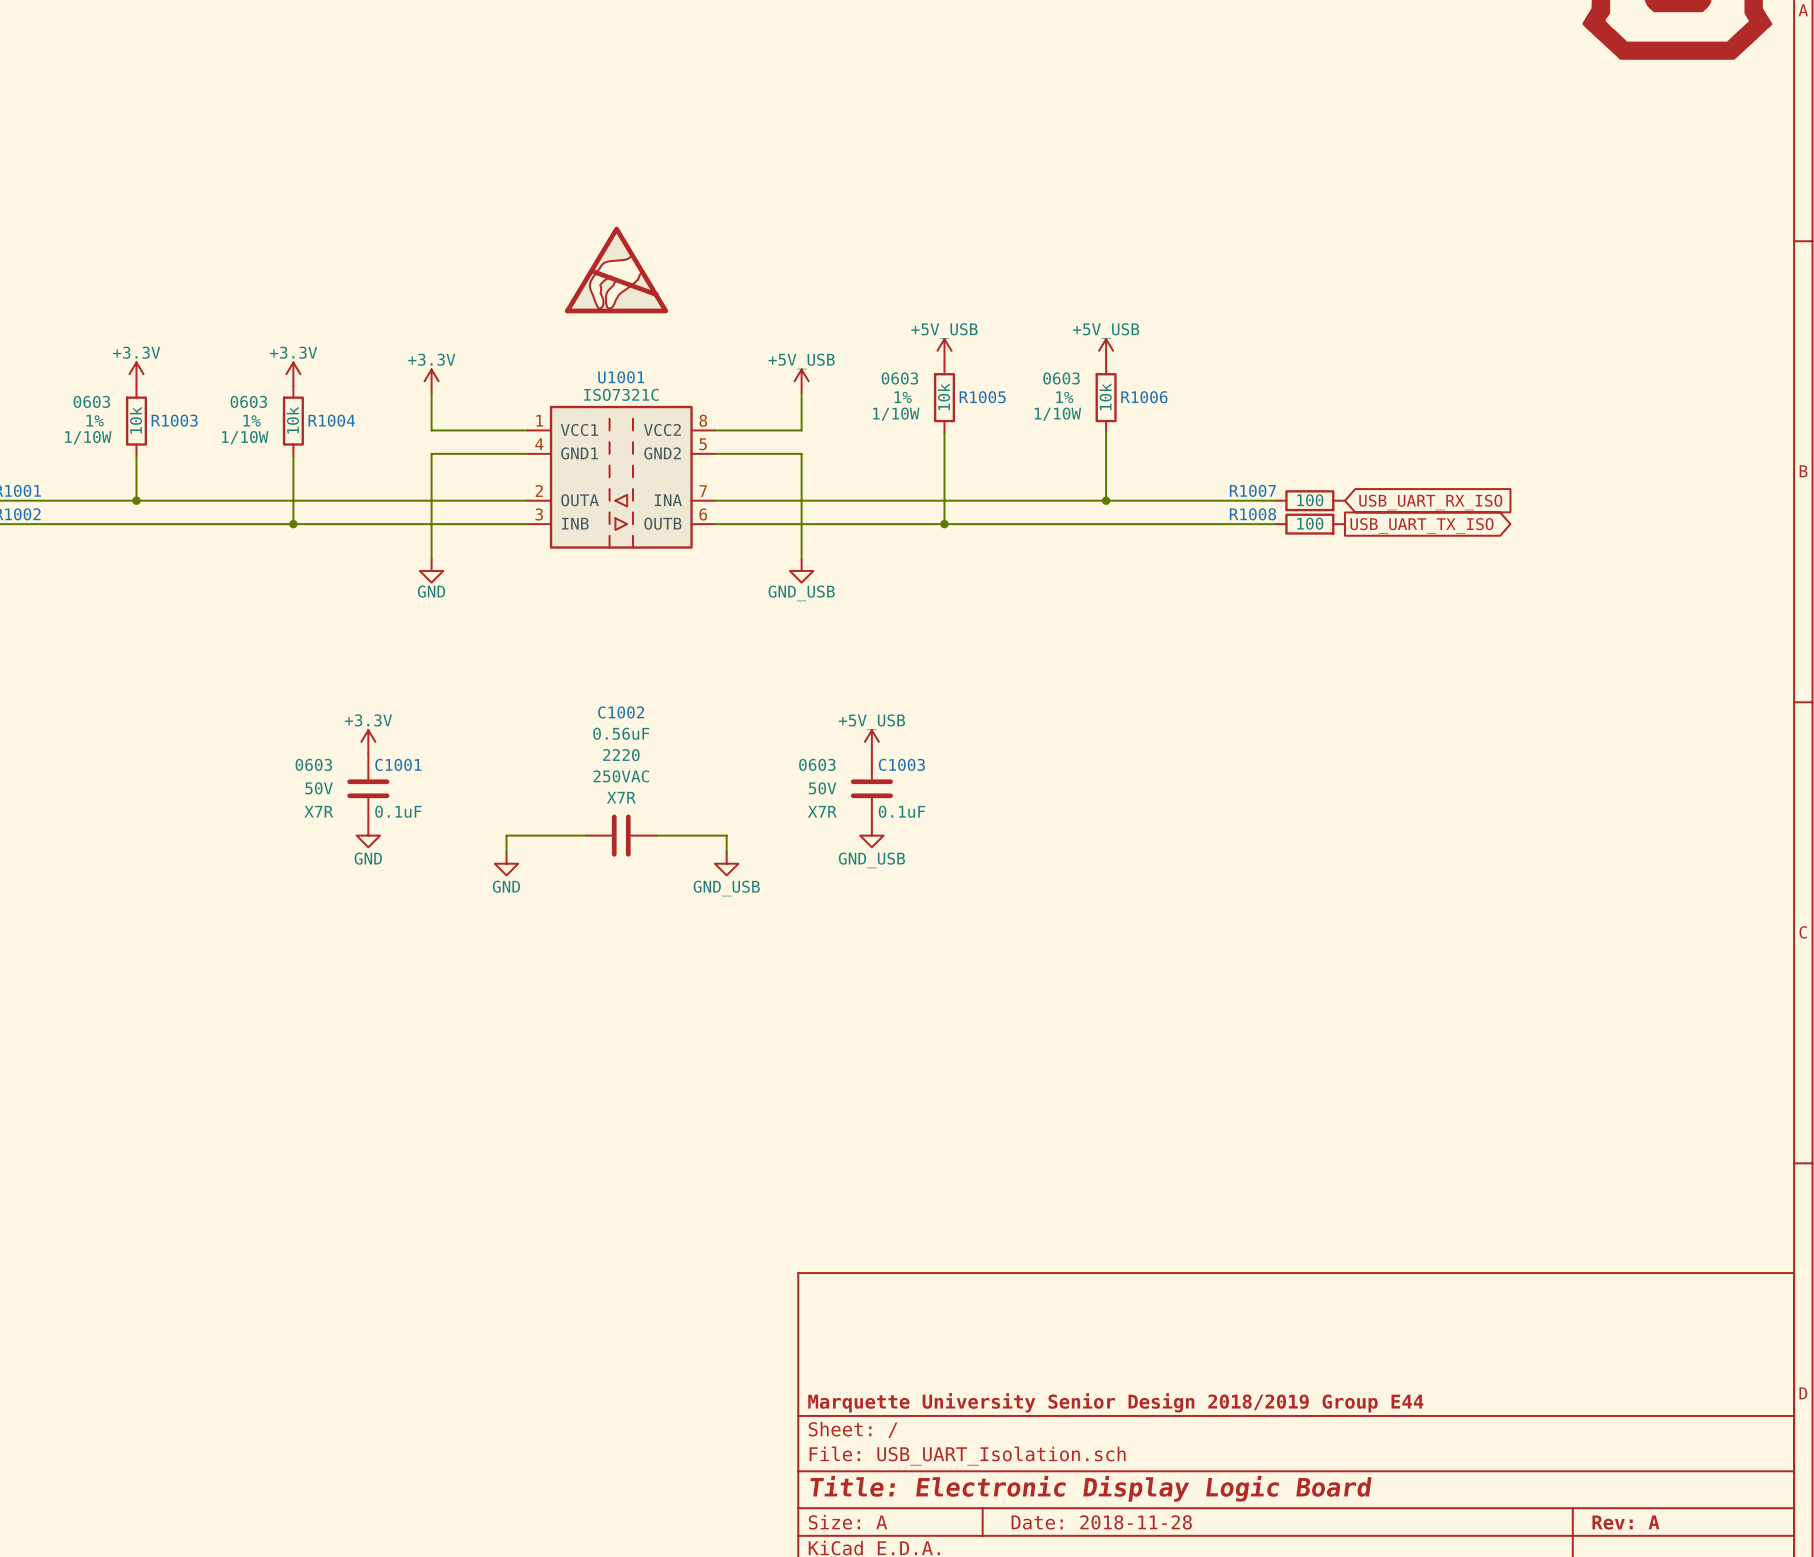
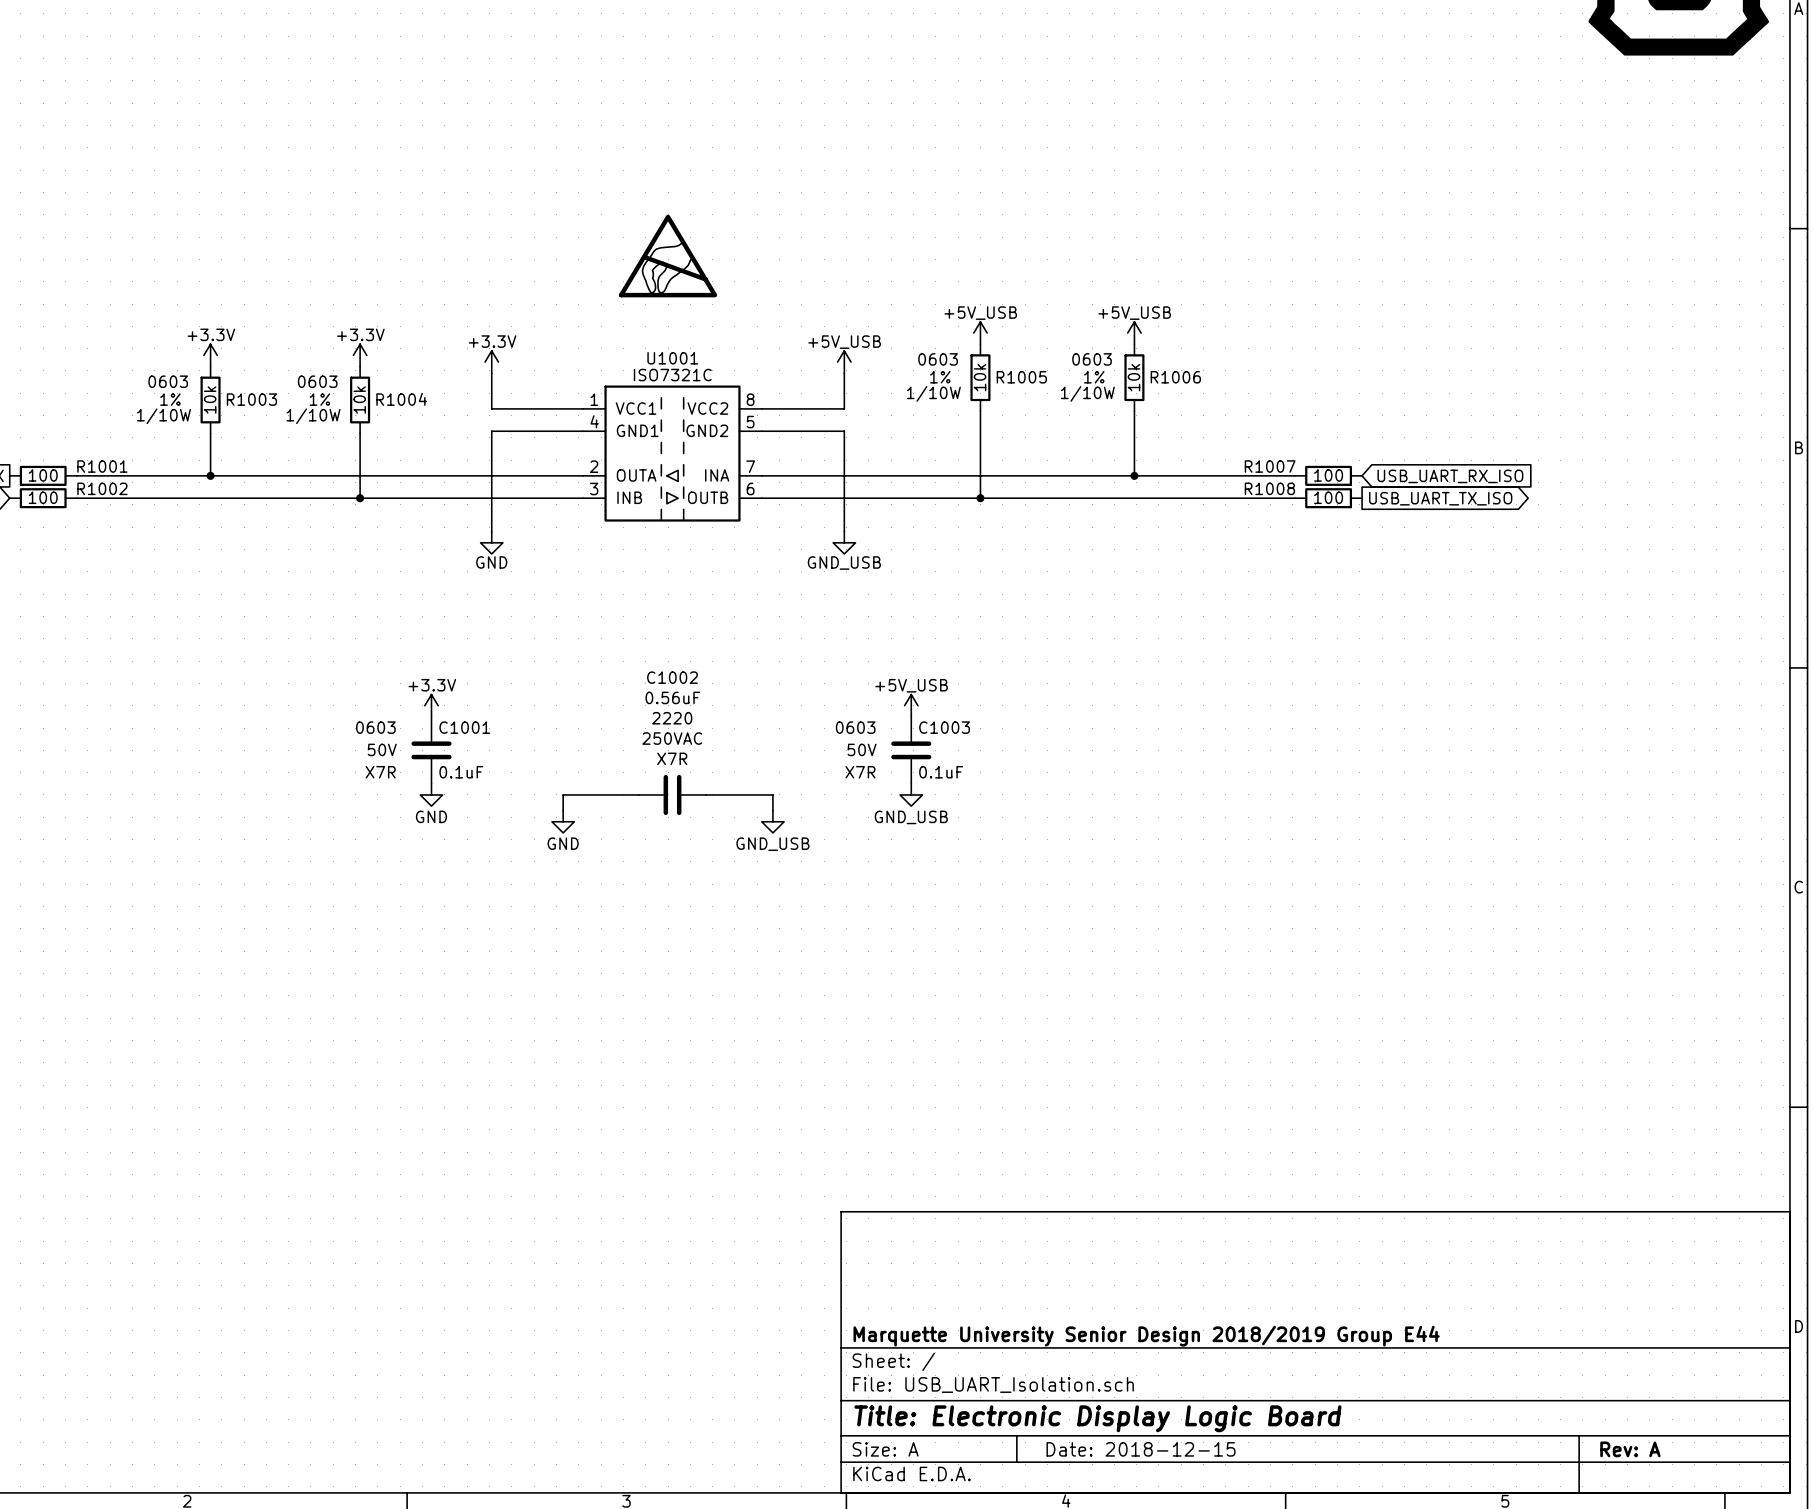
title block: Date: 2018-11-28 (1101, 1522) -> Date: 2018-12-15 (1141, 1449)

